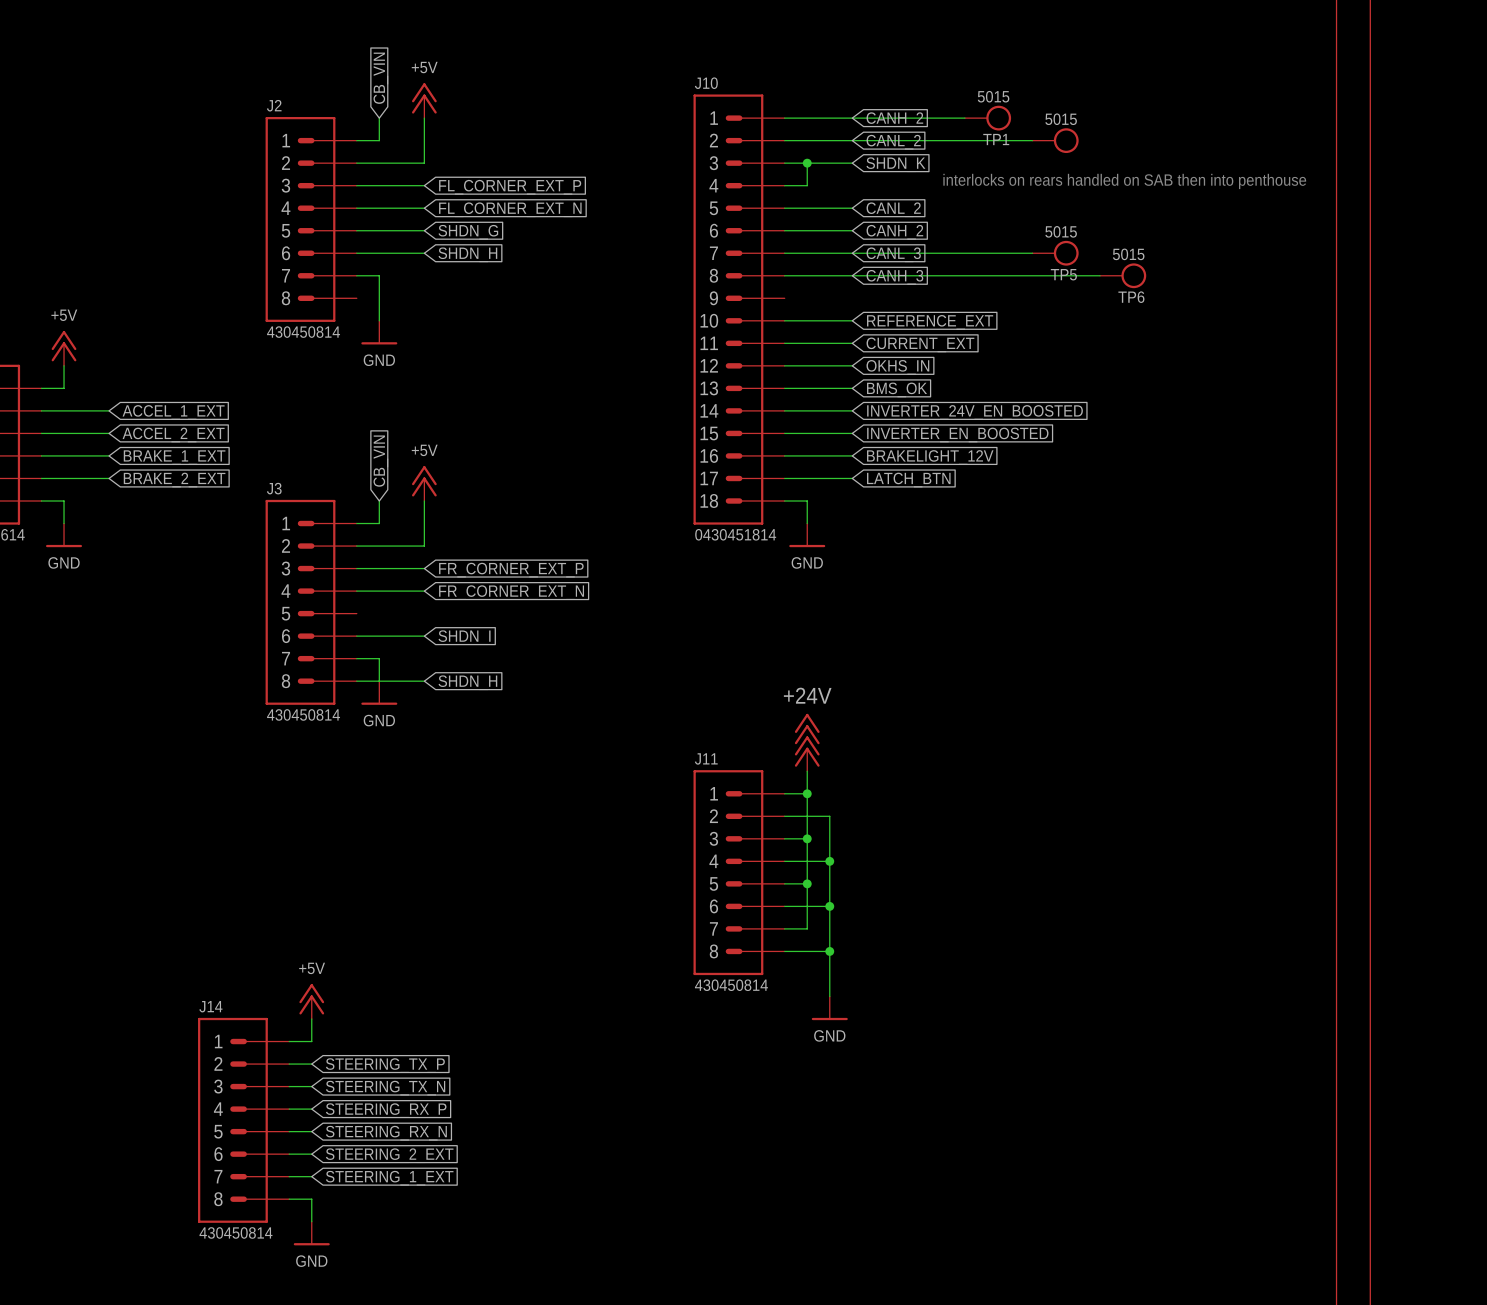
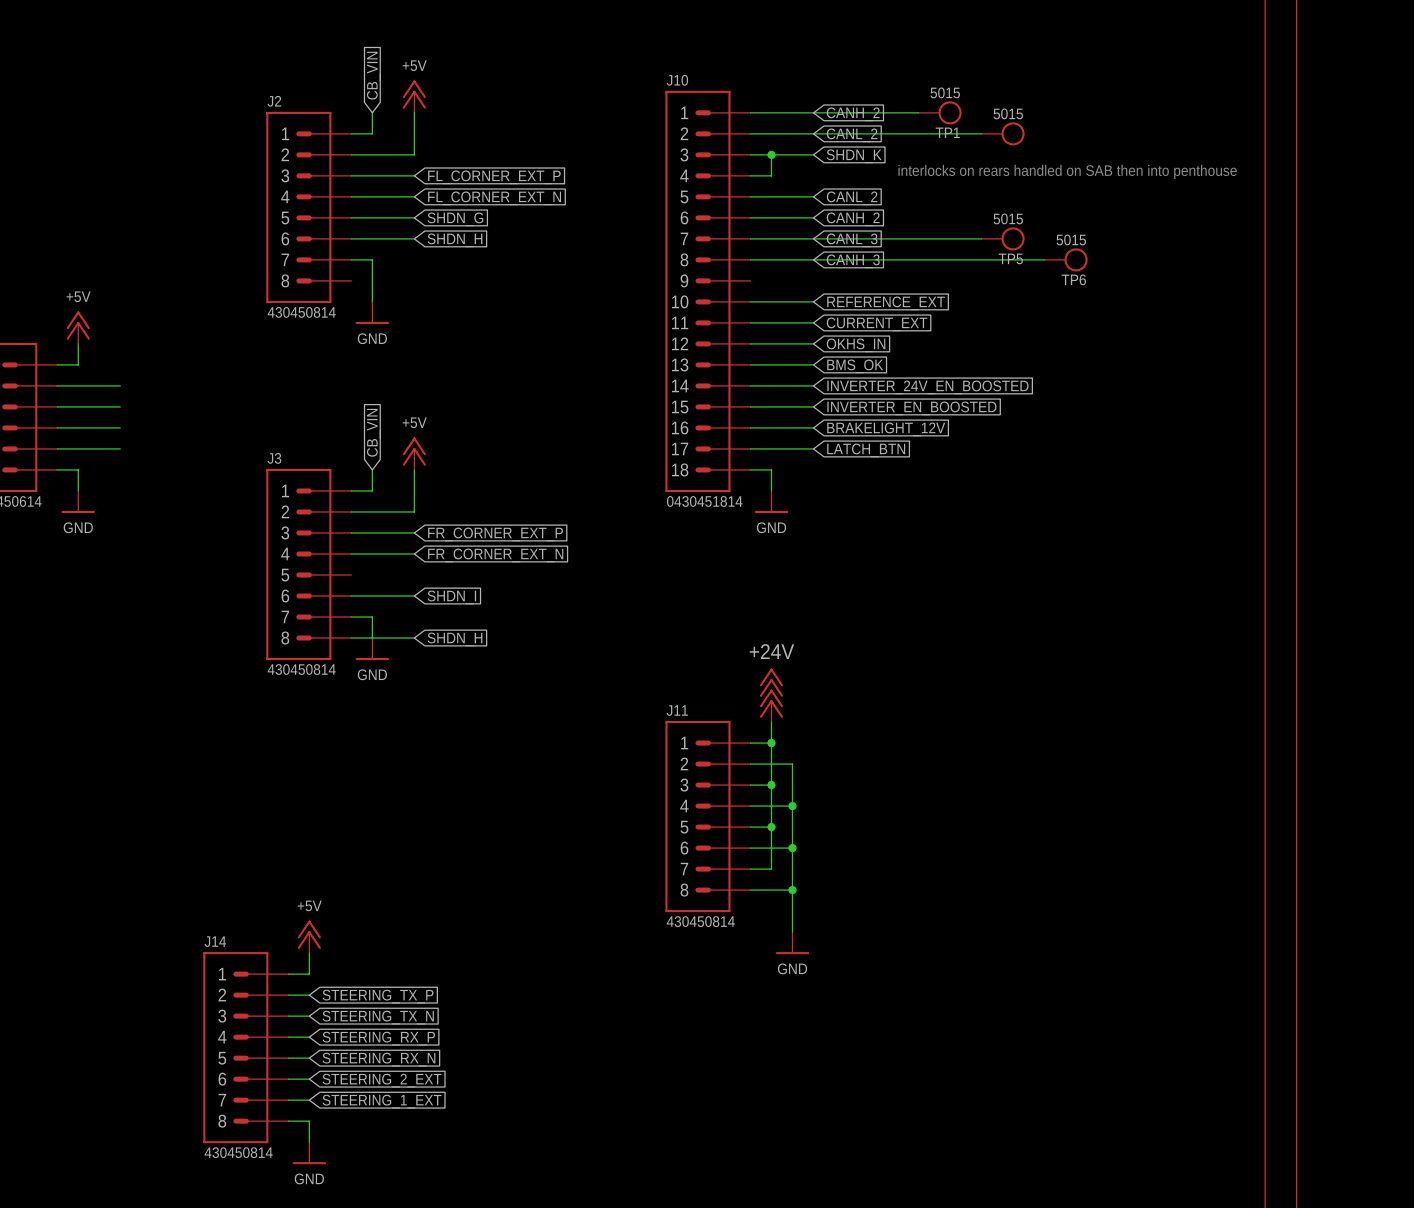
global label: ACCEL_1_EXT (173, 412) -> none
global label: ACCEL_2_EXT (173, 434) -> none
global label: BRAKE_1_EXT (174, 457) -> none
global label: BRAKE_2_EXT (174, 480) -> none

